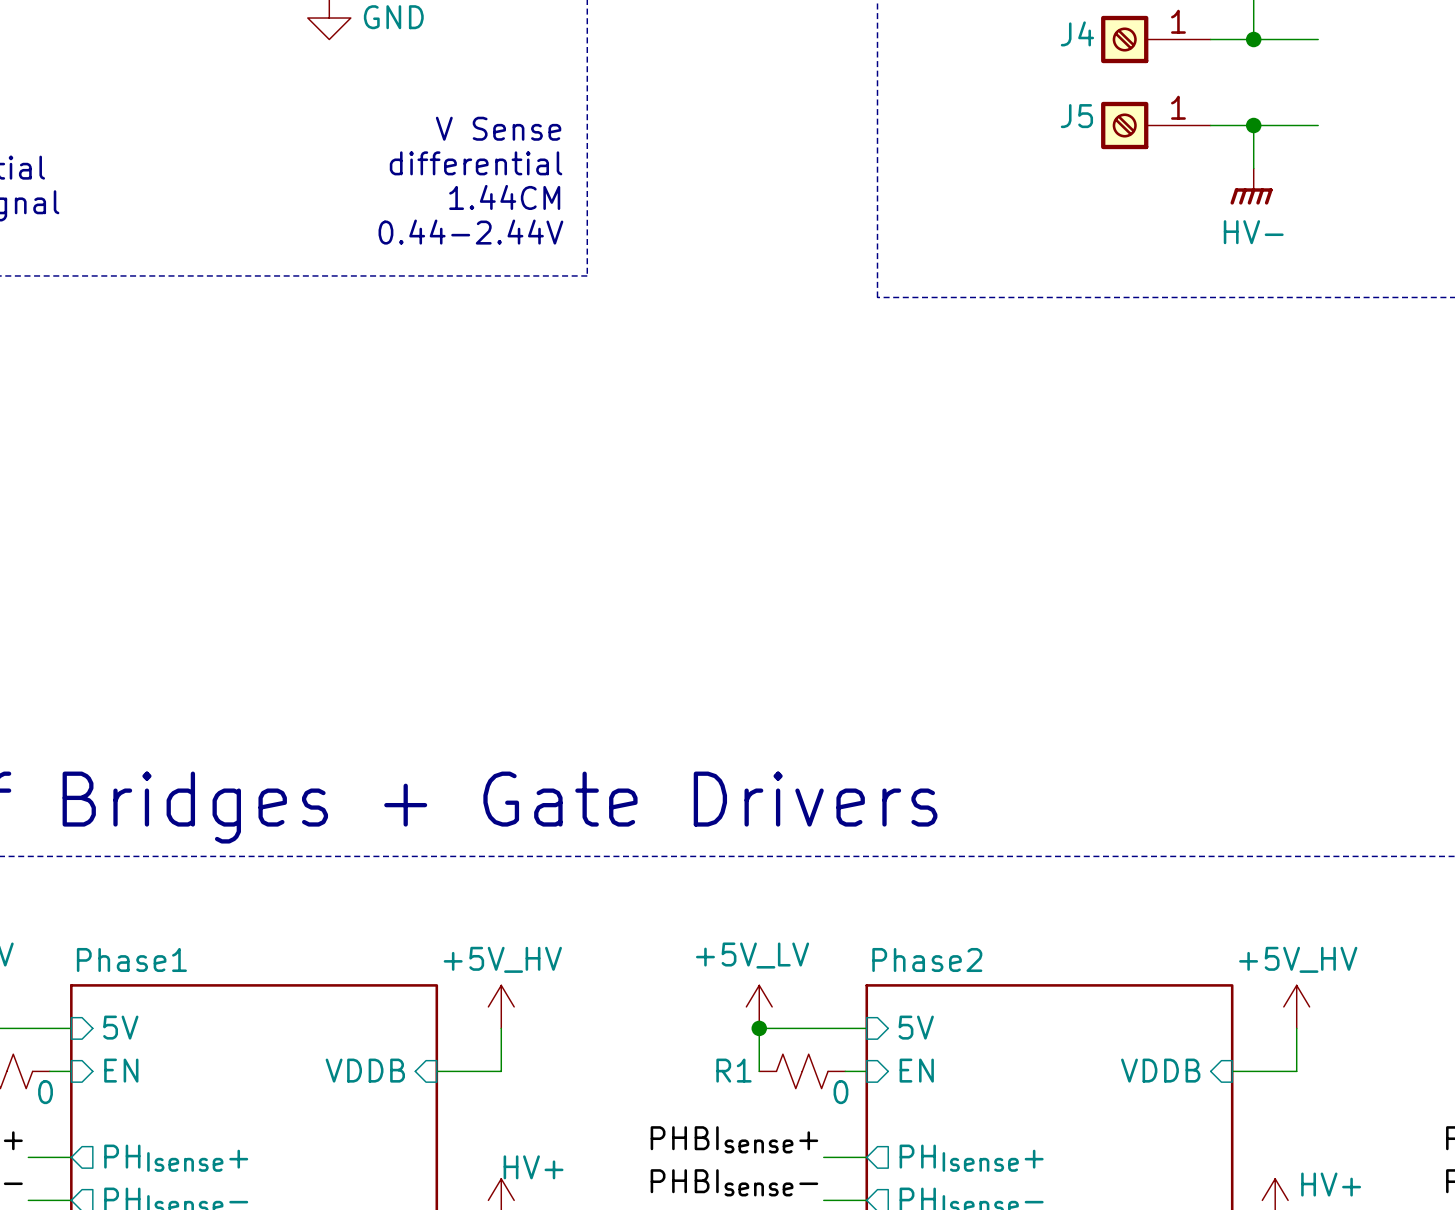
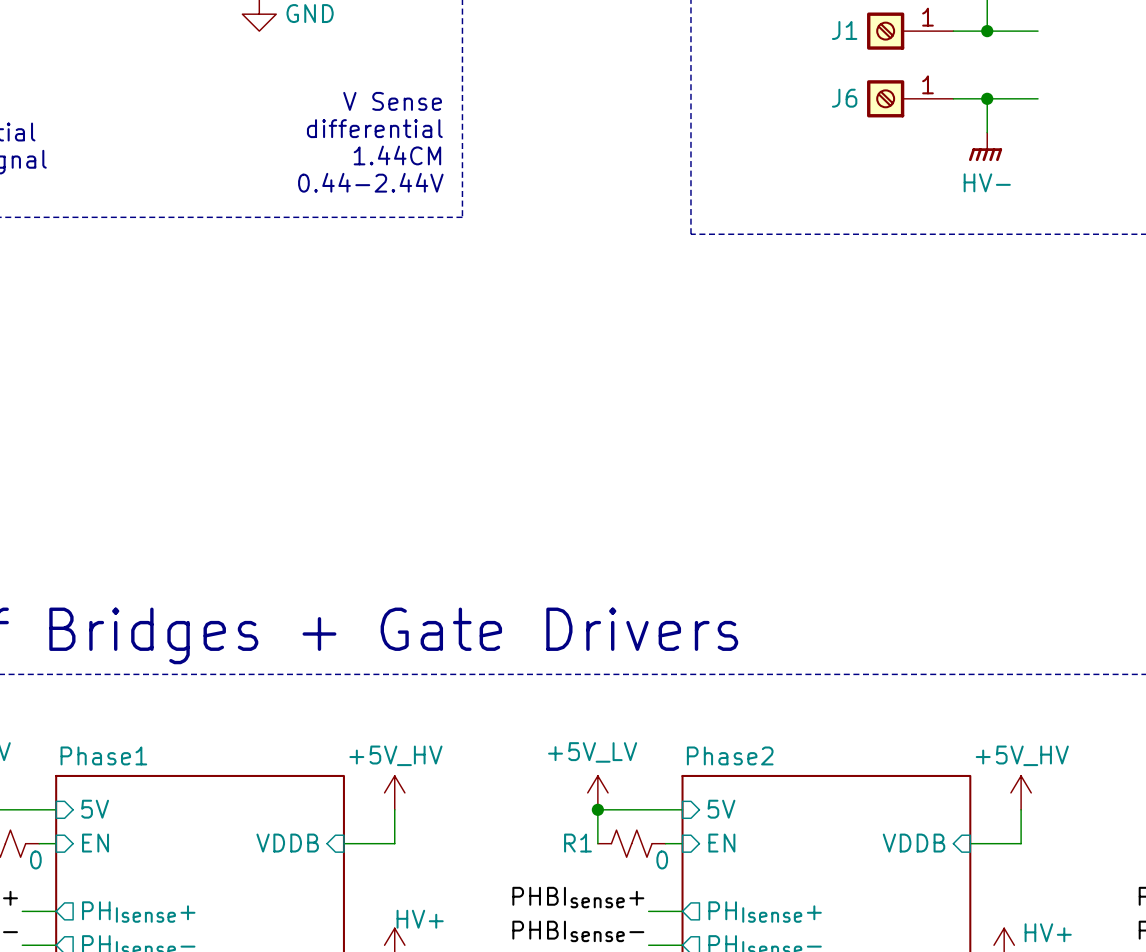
J4 name: J4 (1077, 33) -> J1 (844, 30)
J5 name: J5 (1076, 116) -> J6 (844, 98)

